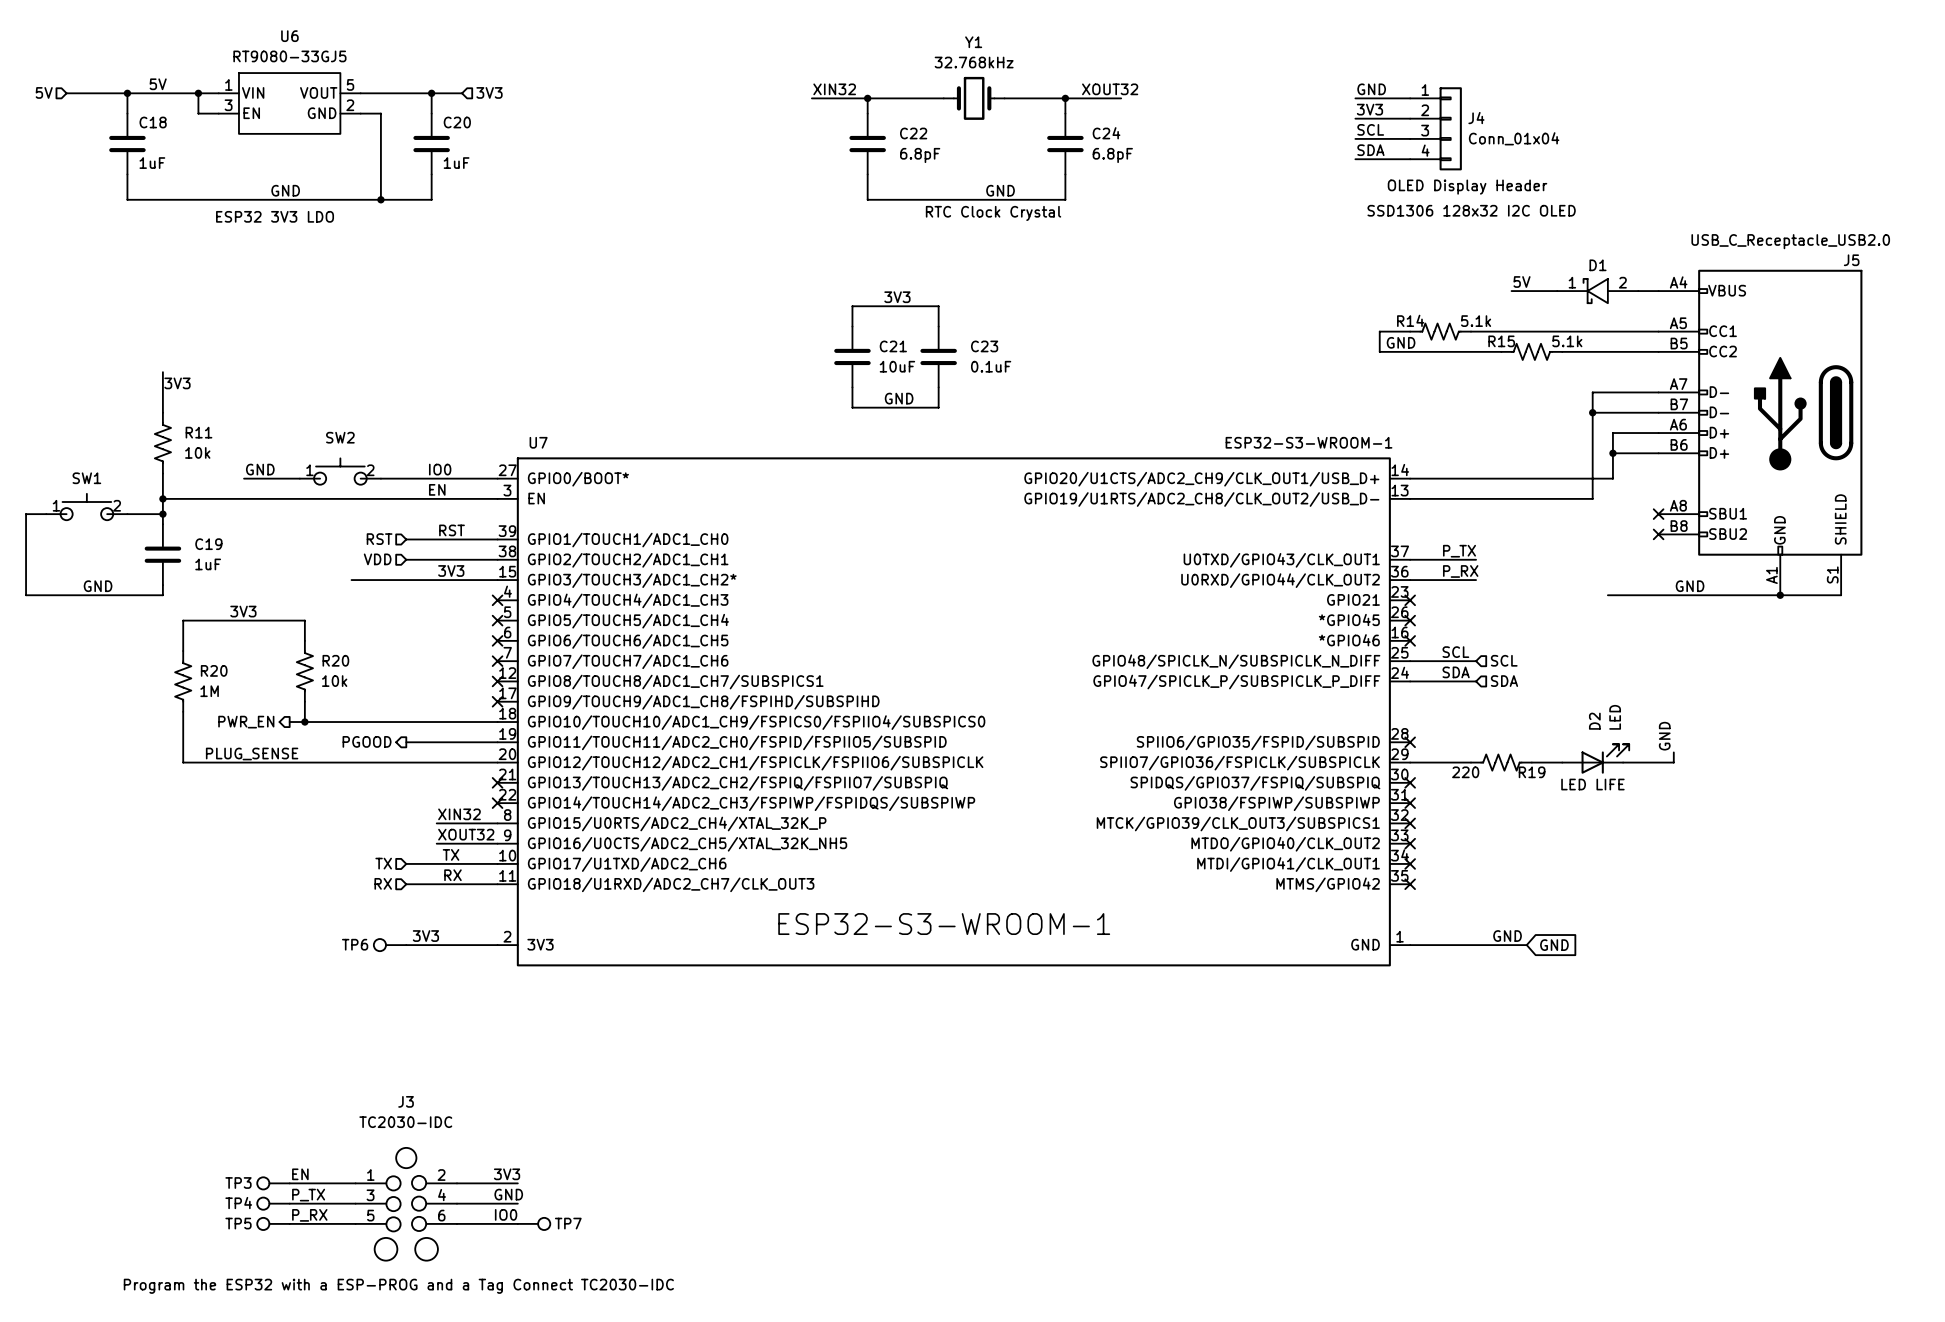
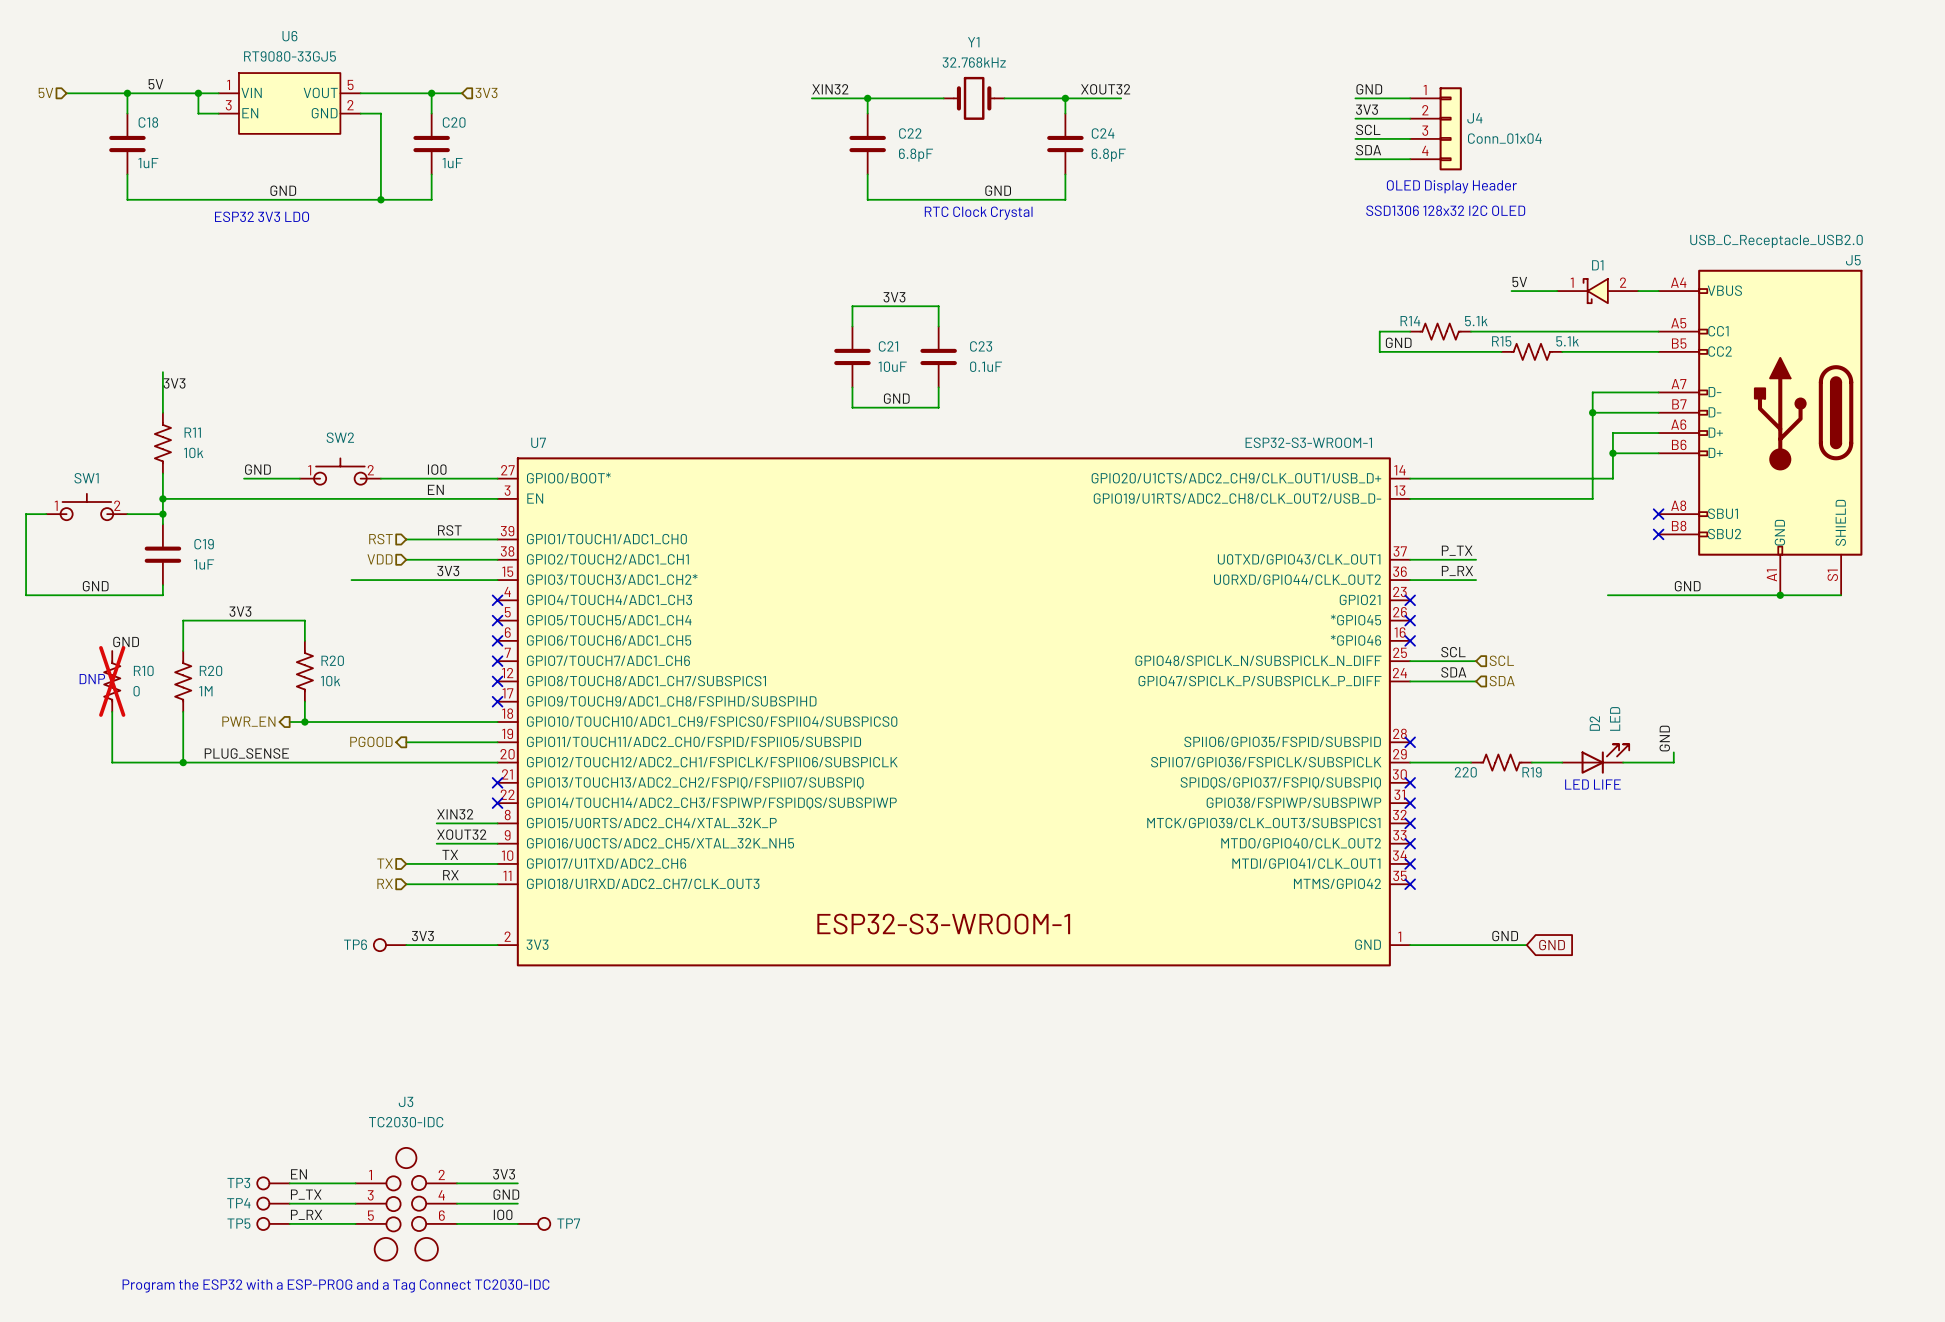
label: none -> GND (126, 641)
text: none -> DNP (92, 679)
R10: none -> 0 (112, 681)
wire: none -> (112, 711) (112, 762) (183, 762)
junction: none -> (183, 762)

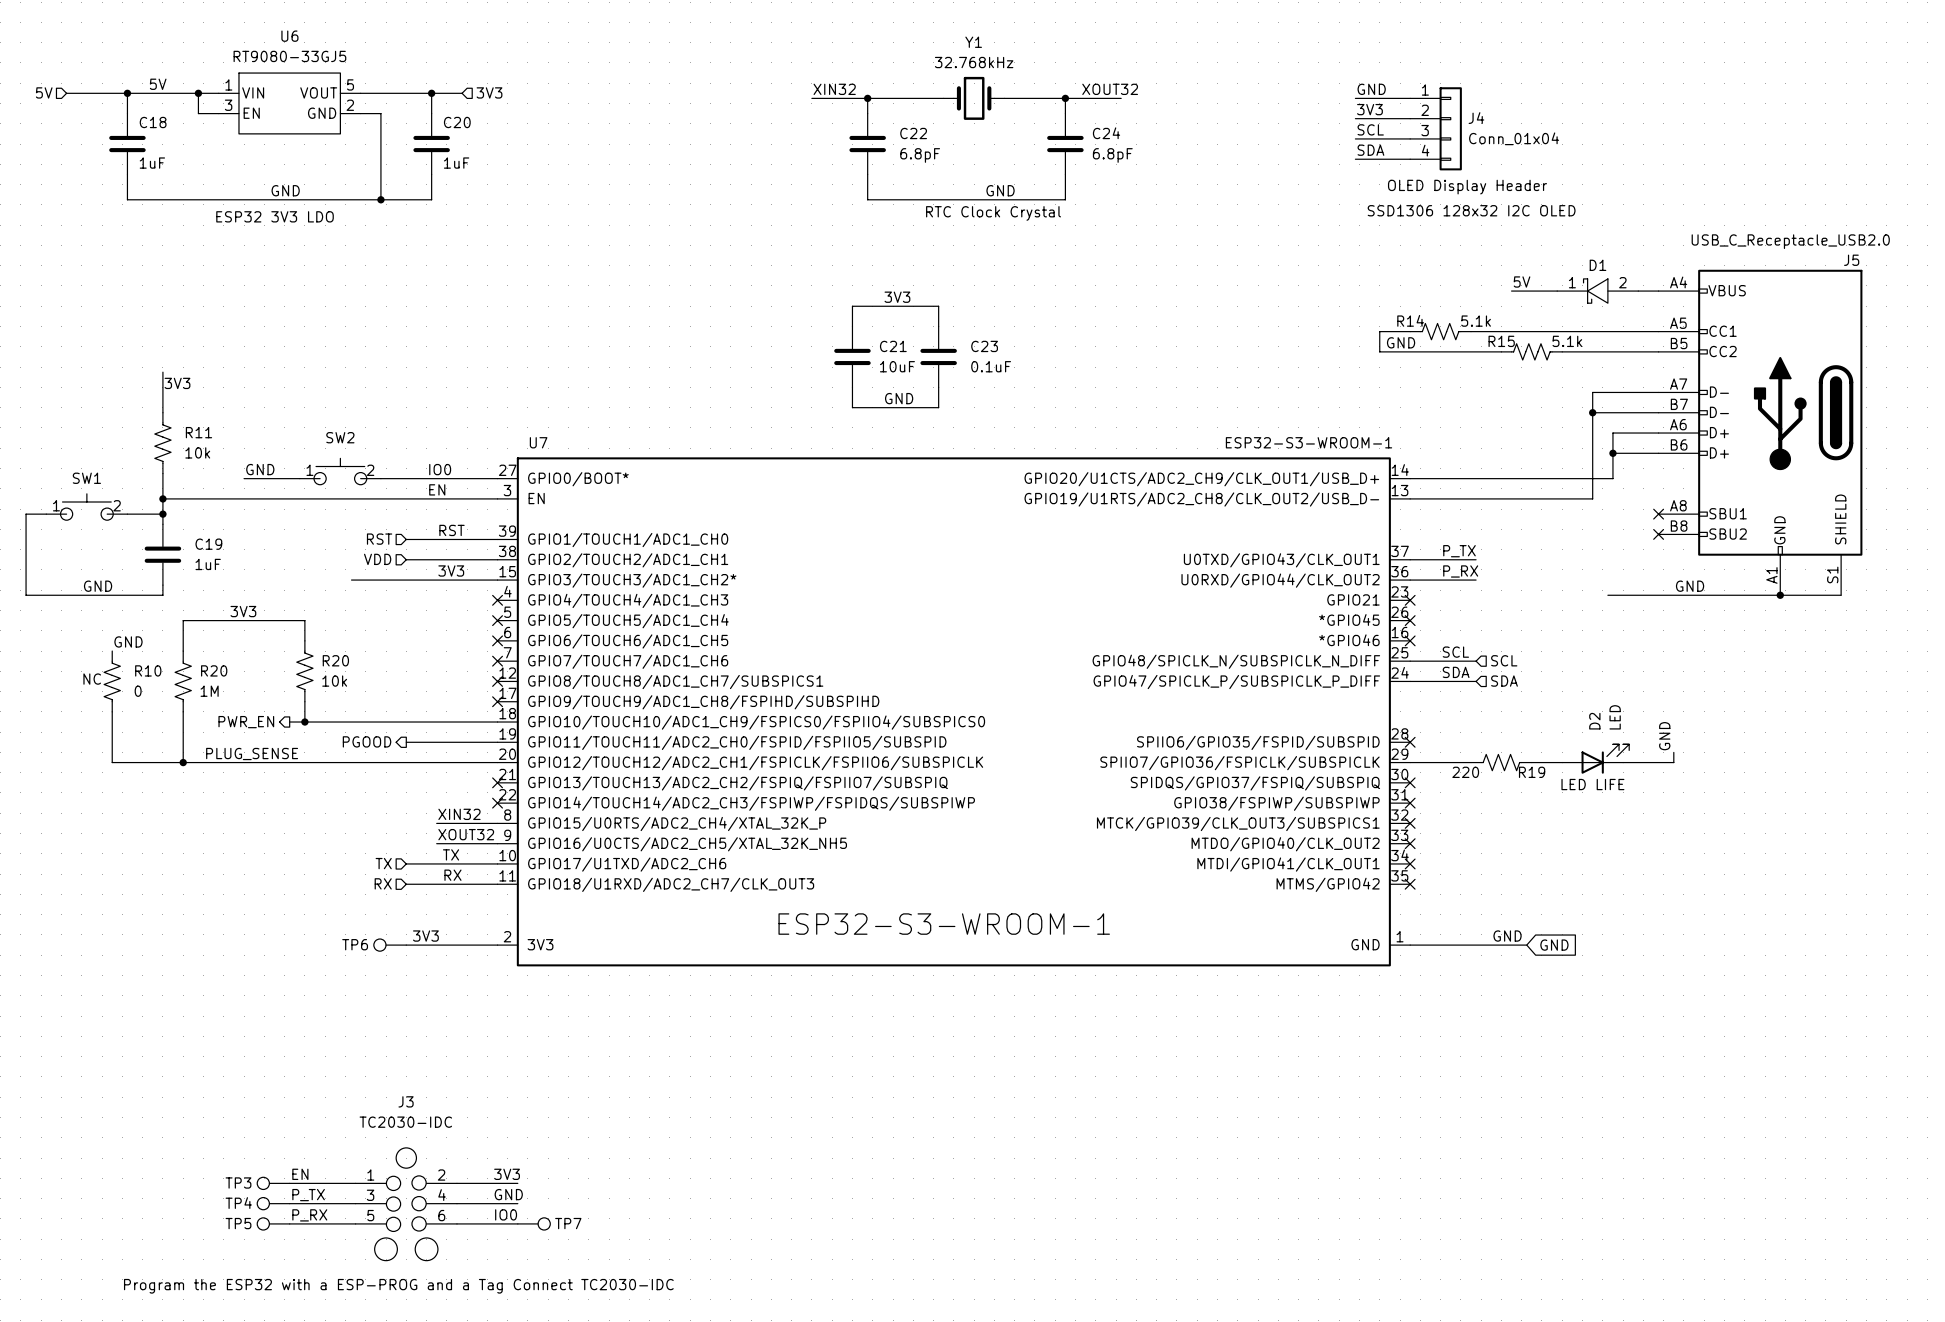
text: DNP (92, 679) -> NC (92, 679)
R10 do-not-place cross: (112, 681) -> none

